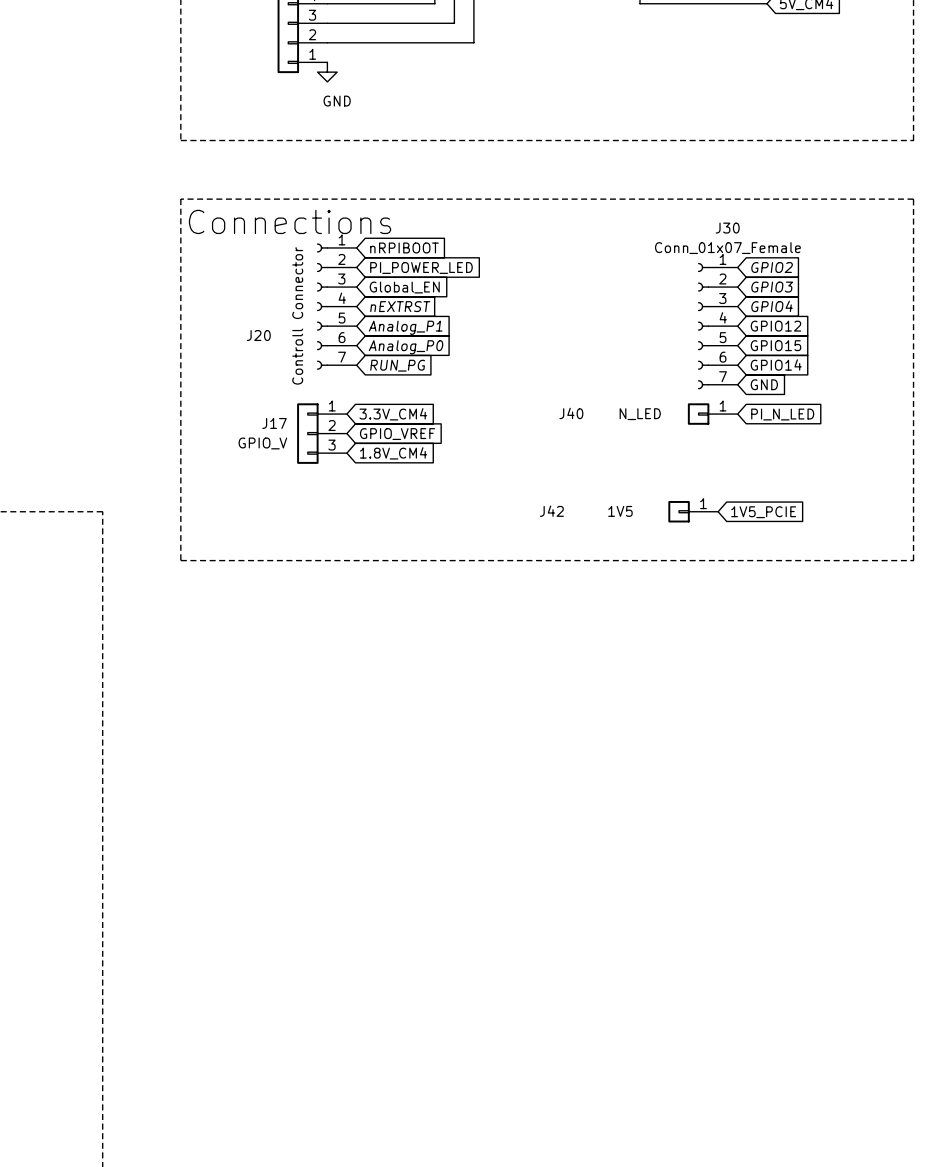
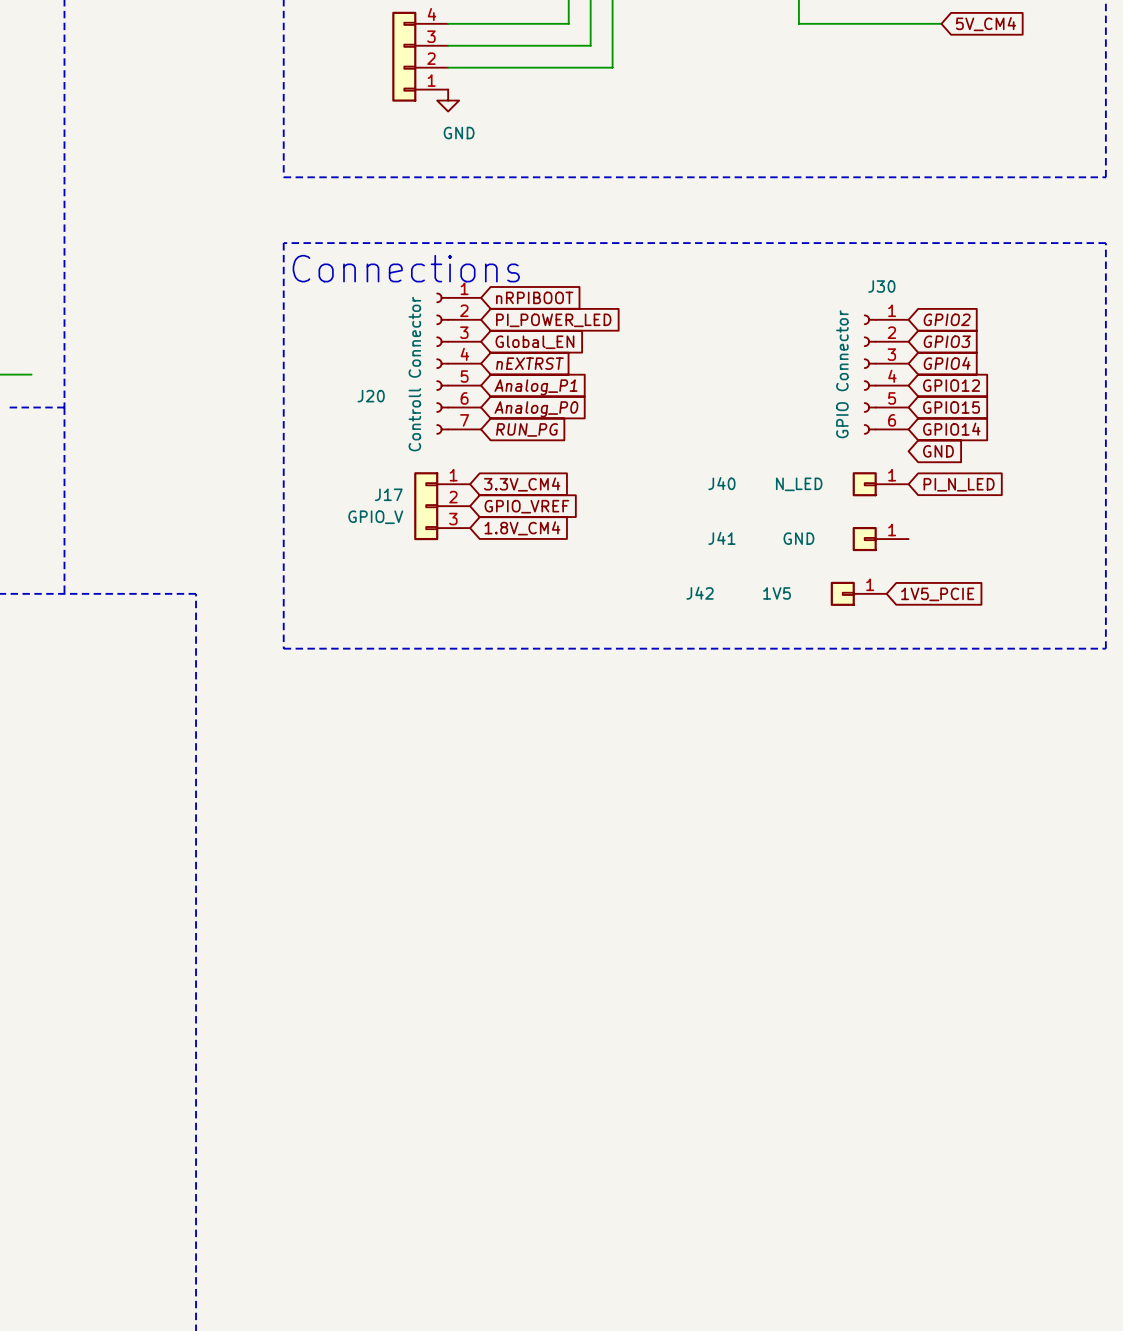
J30 name position: J30 (727, 228) -> J30 (881, 286)
J30 value: Conn_01x07_Female (727, 248) -> GPIO Connector (842, 374)
J30 symbol: [698, 263, 738, 390] -> [864, 314, 909, 435]
J41: none -> GND (880, 539)

